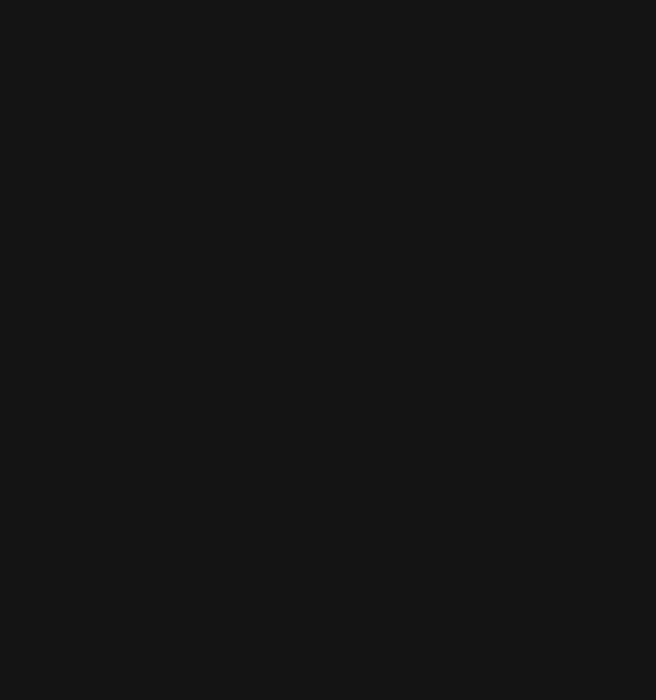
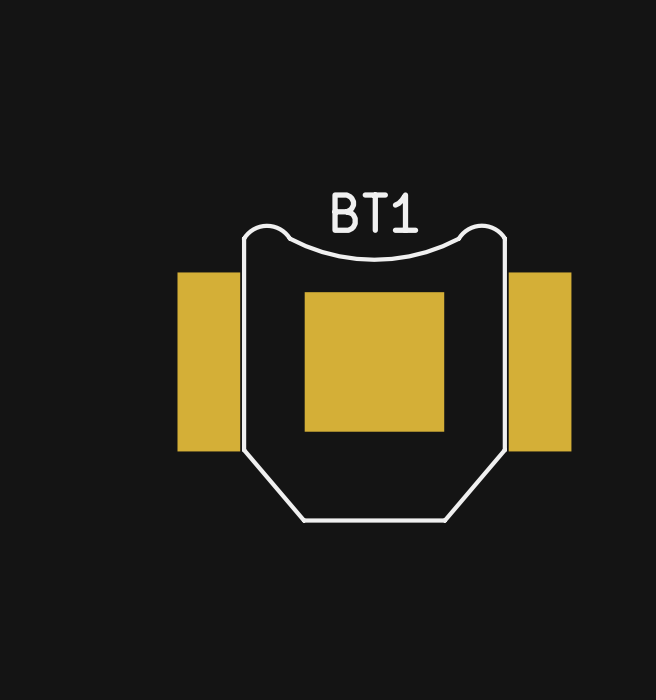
BT1: none -> (374, 373)

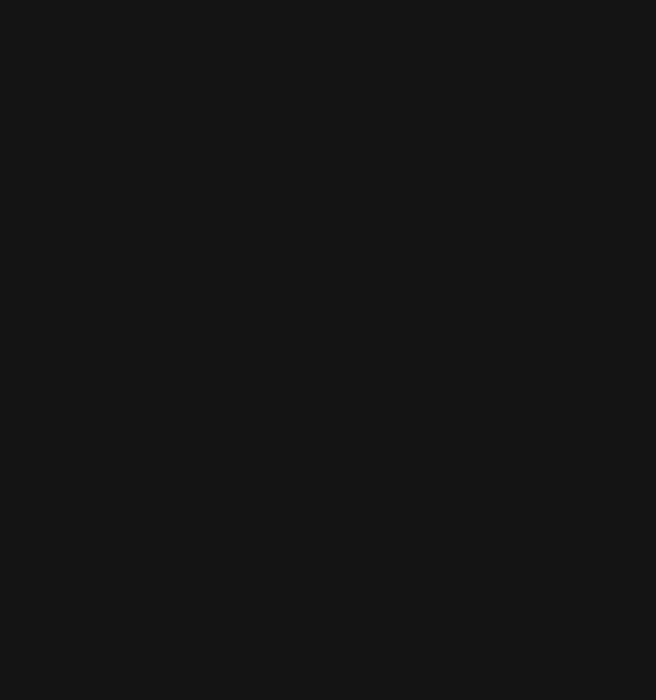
BT1: (374, 373) -> none

